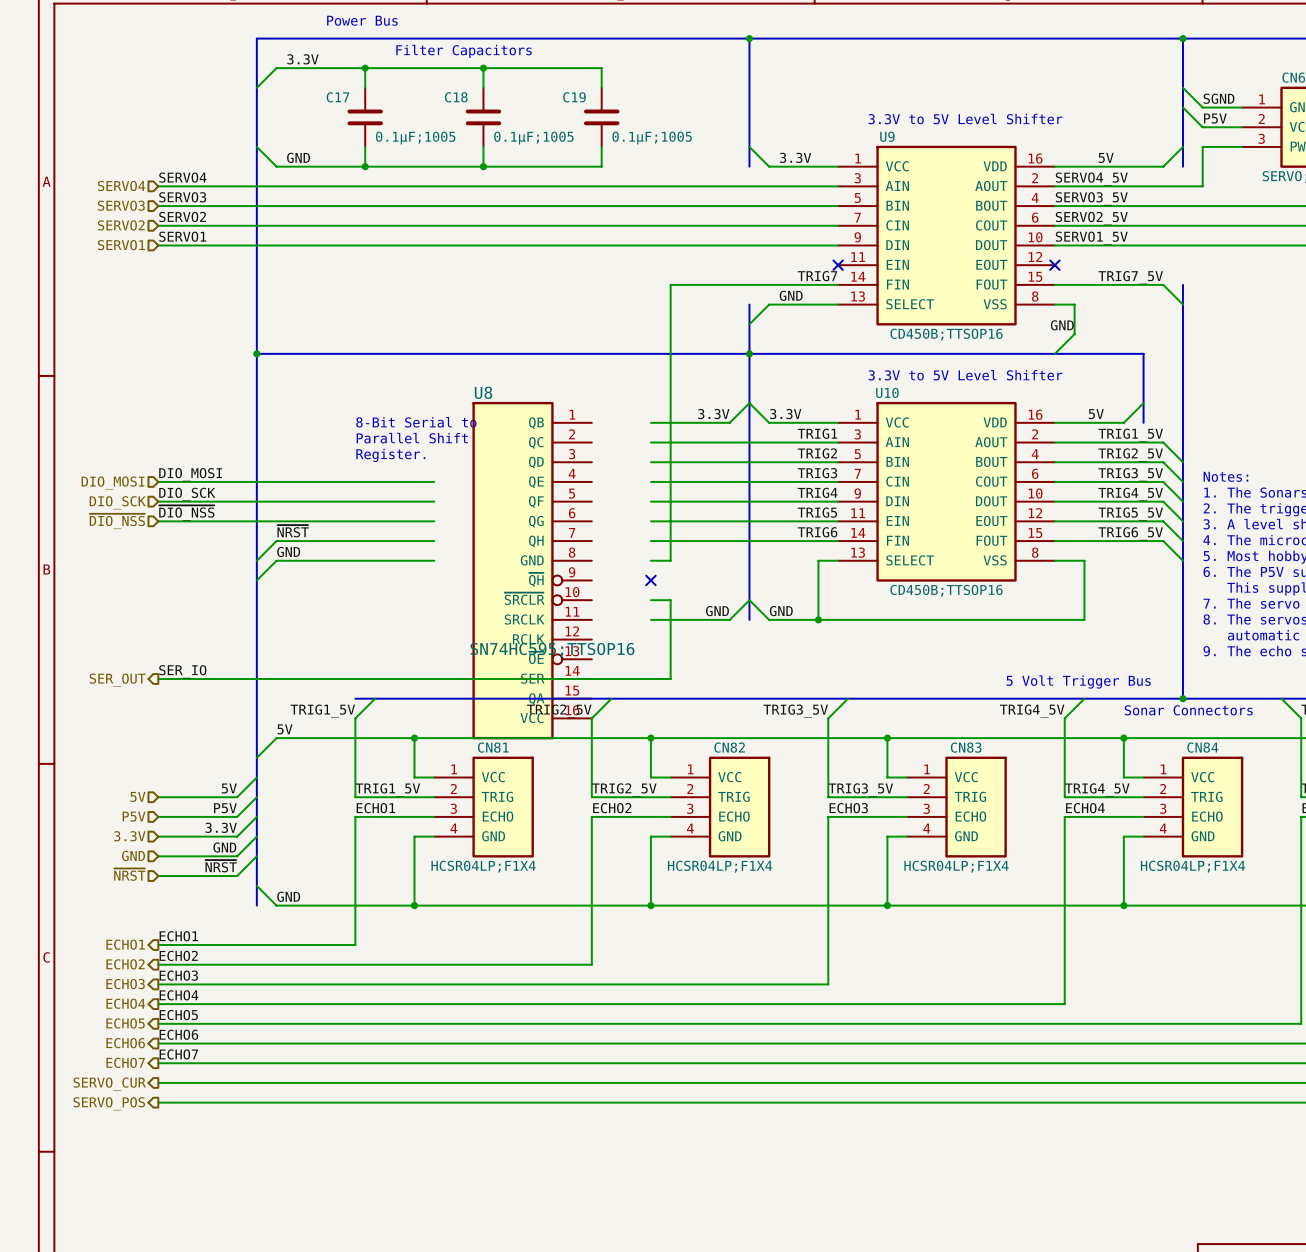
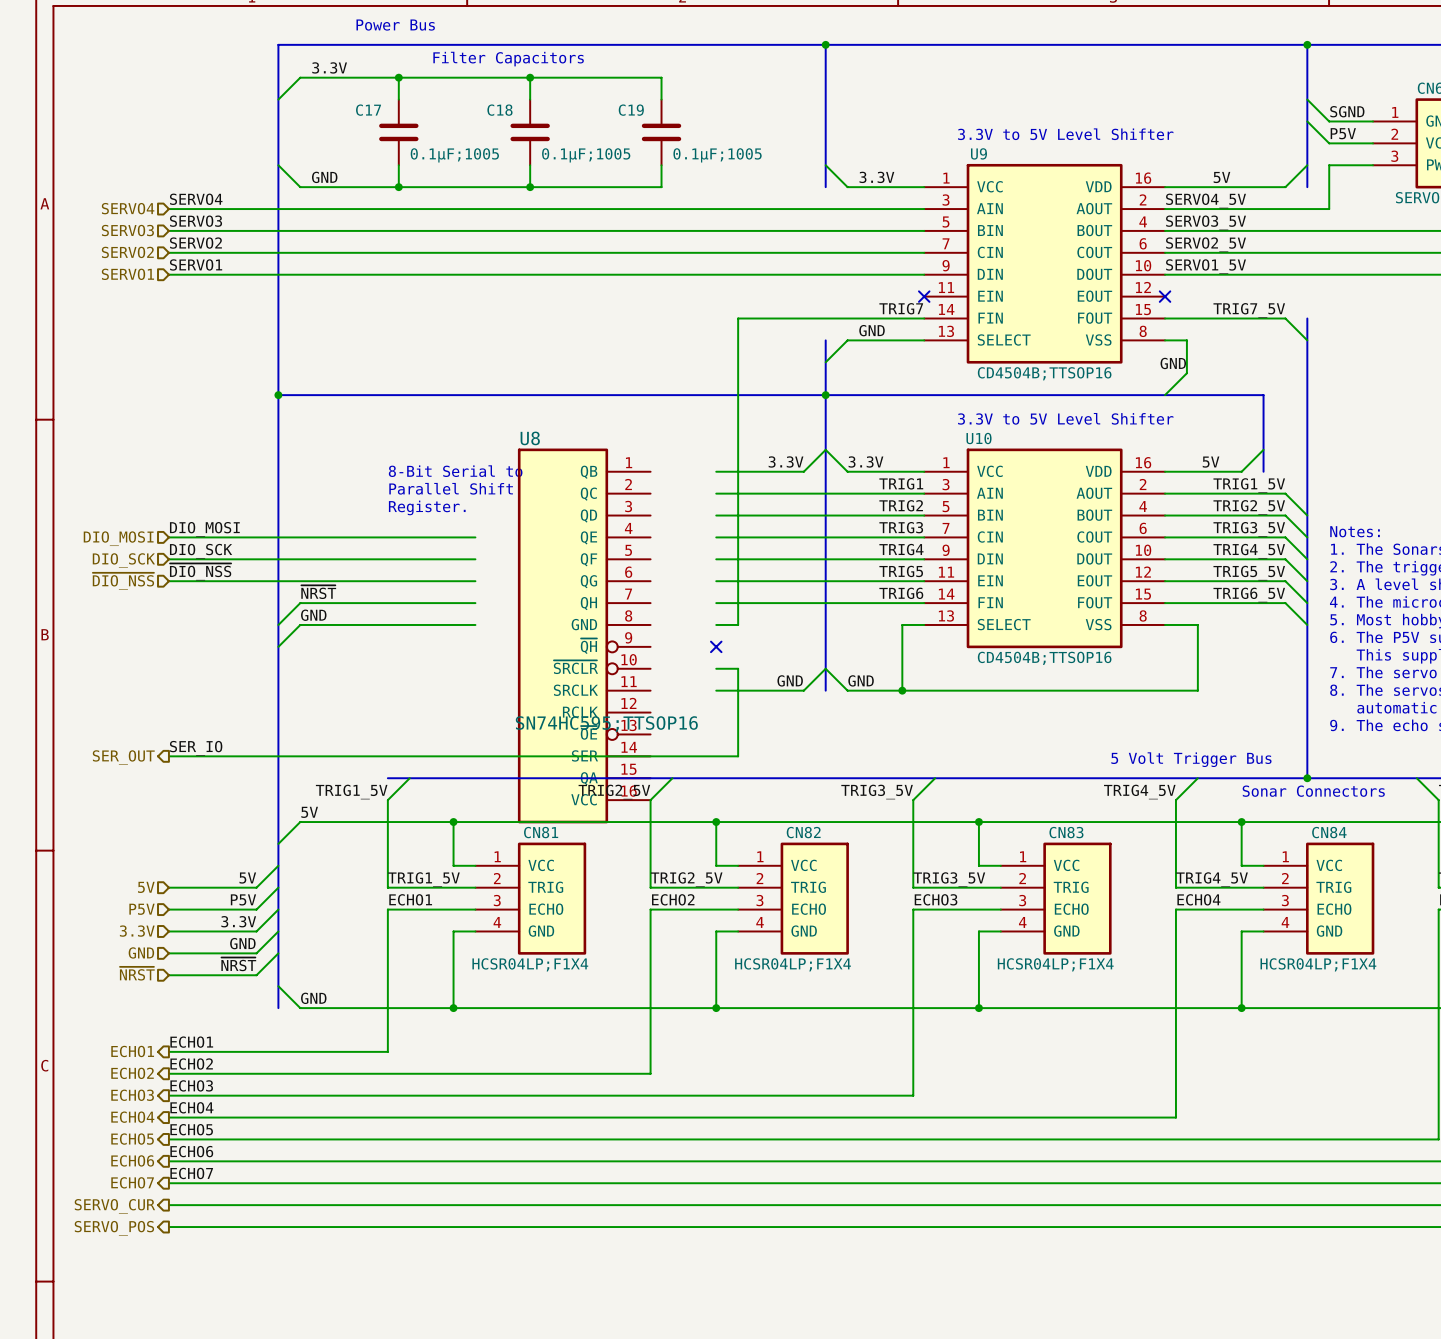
U9 value: CD450B;TTSOP16 (946, 334) -> CD4504B;TTSOP16 (1044, 373)
U10 value: CD450B;TTSOP16 (946, 590) -> CD4504B;TTSOP16 (1044, 658)

